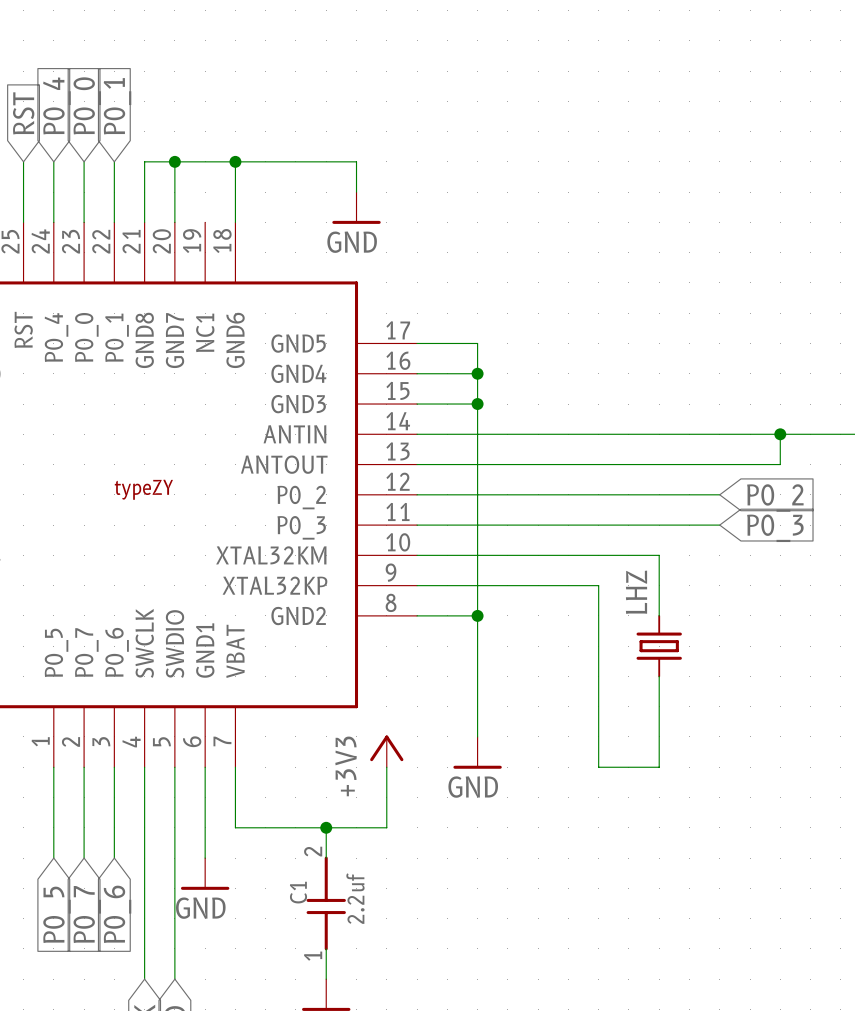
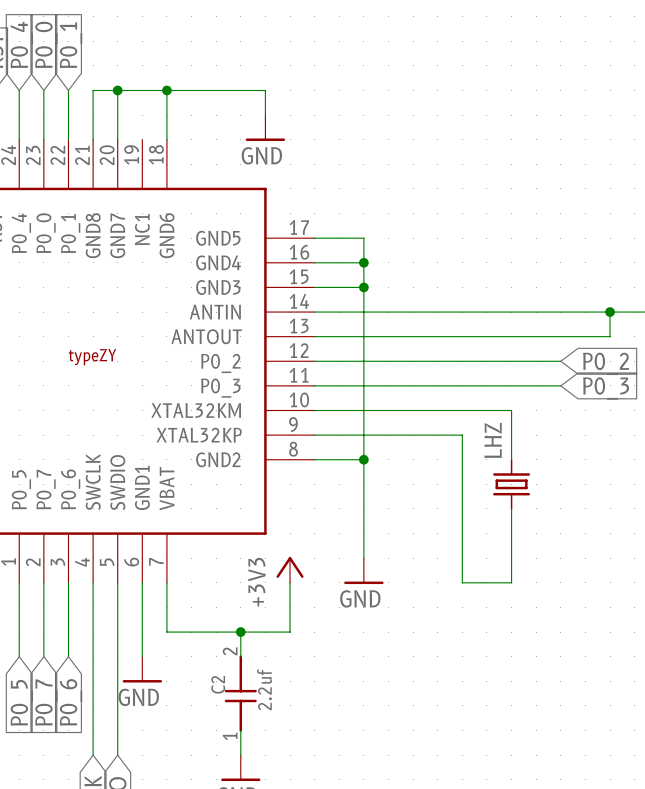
C1 name: C1 (298, 892) -> C2 (218, 684)

